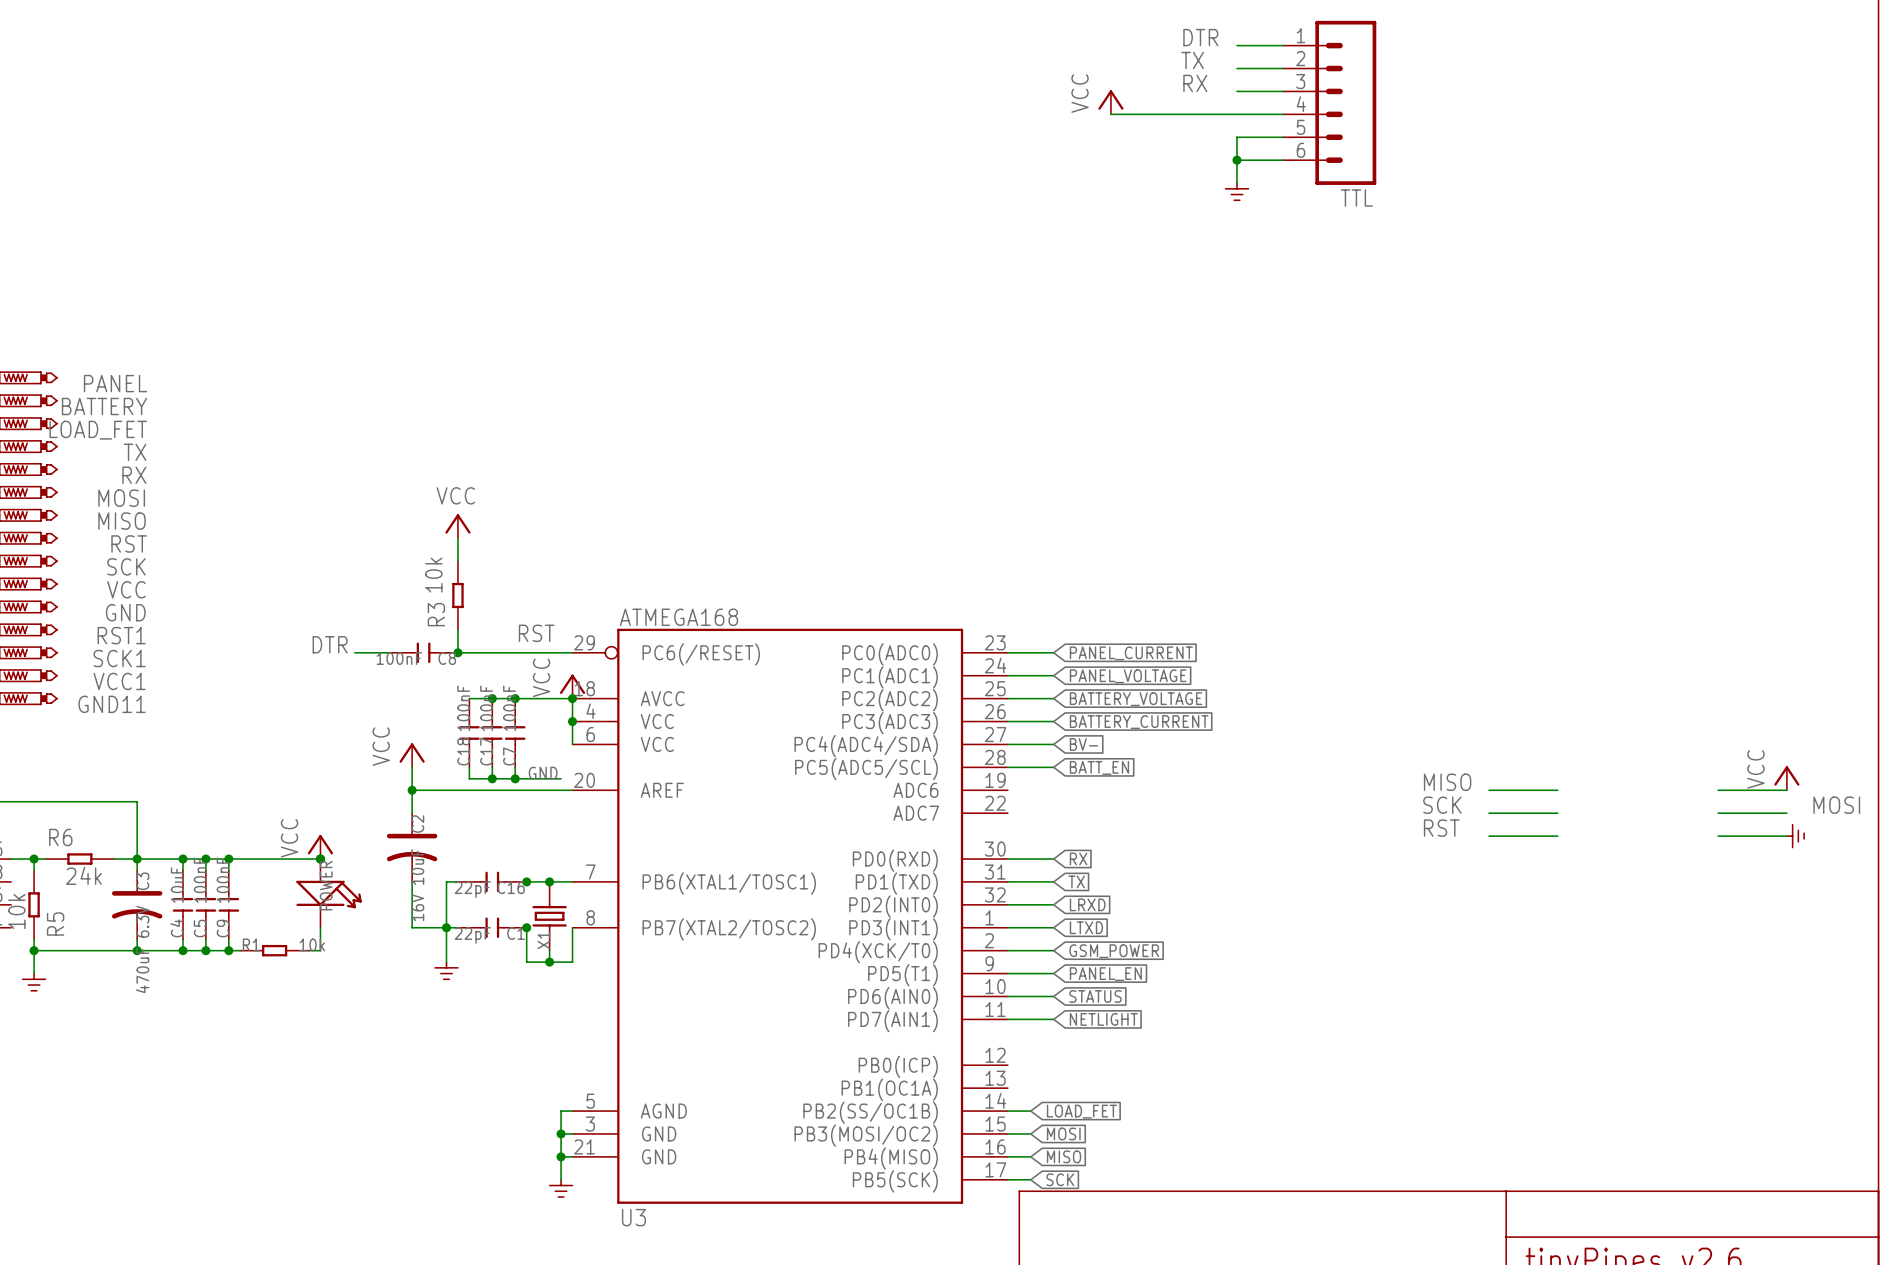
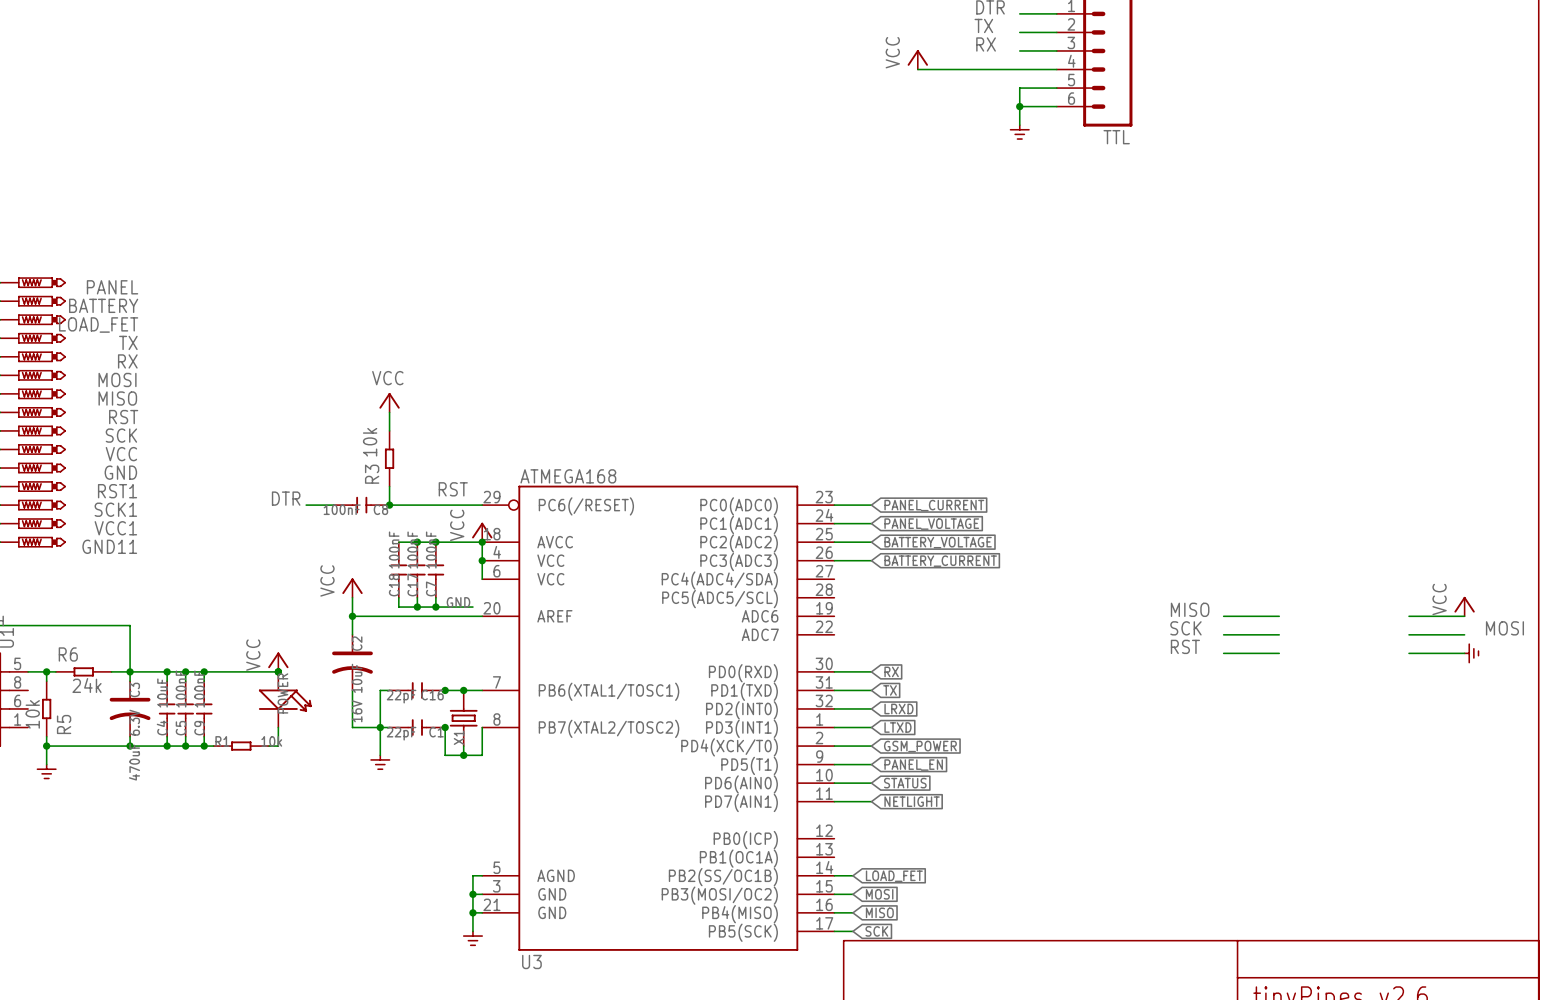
wire: (1007, 744) (1053, 744) -> none
global label: BV- (1083, 744) -> none
wire: (1007, 767) (1053, 767) -> none
global label: BATT_EN (1099, 767) -> none

